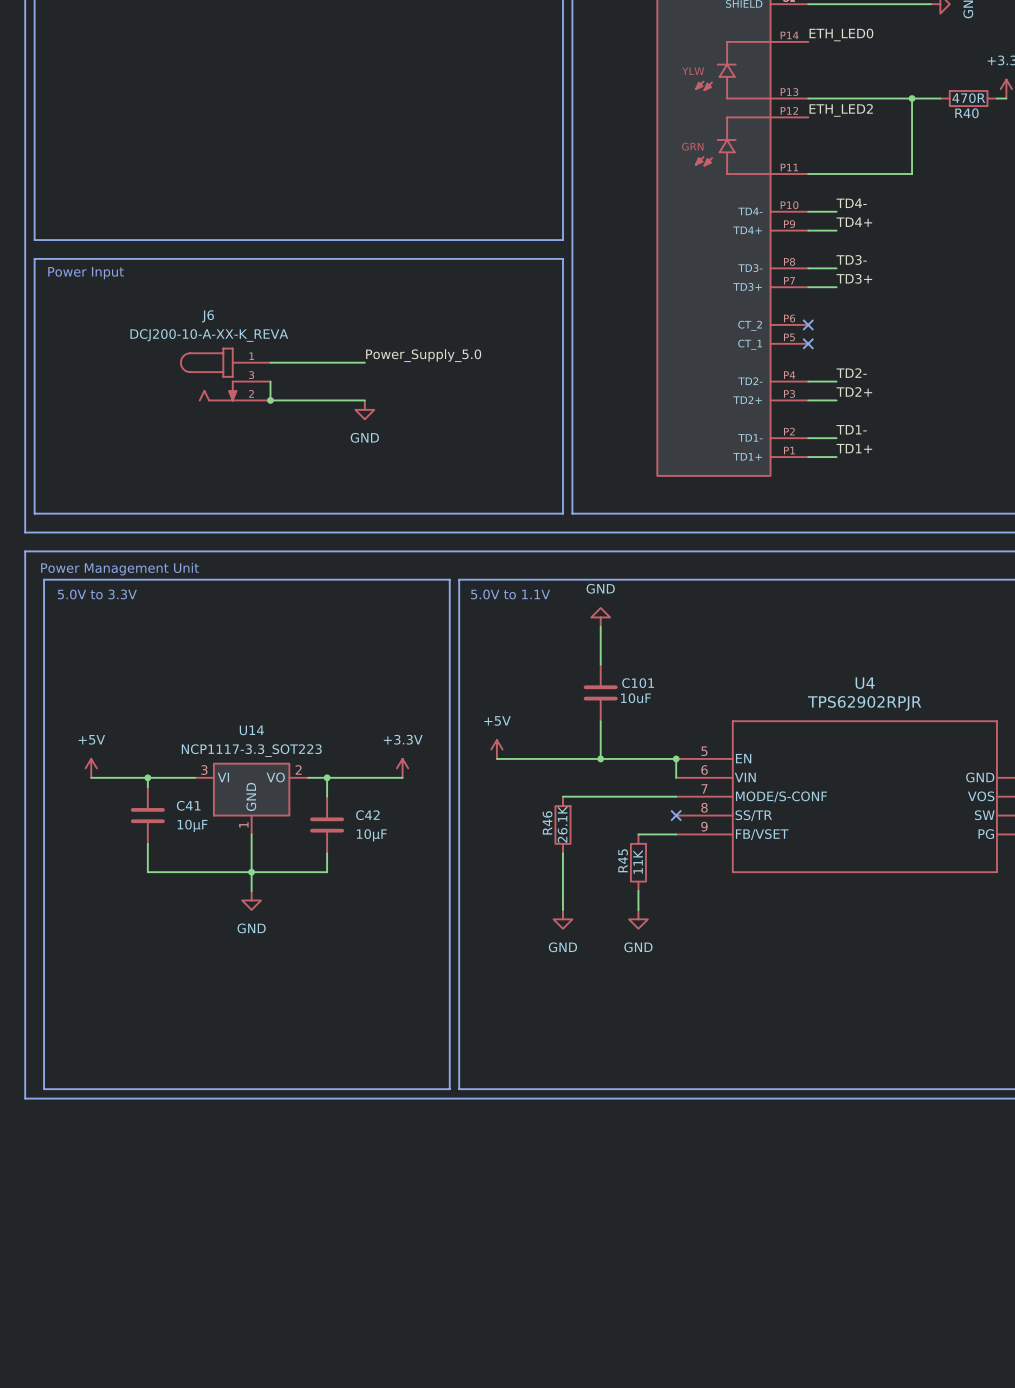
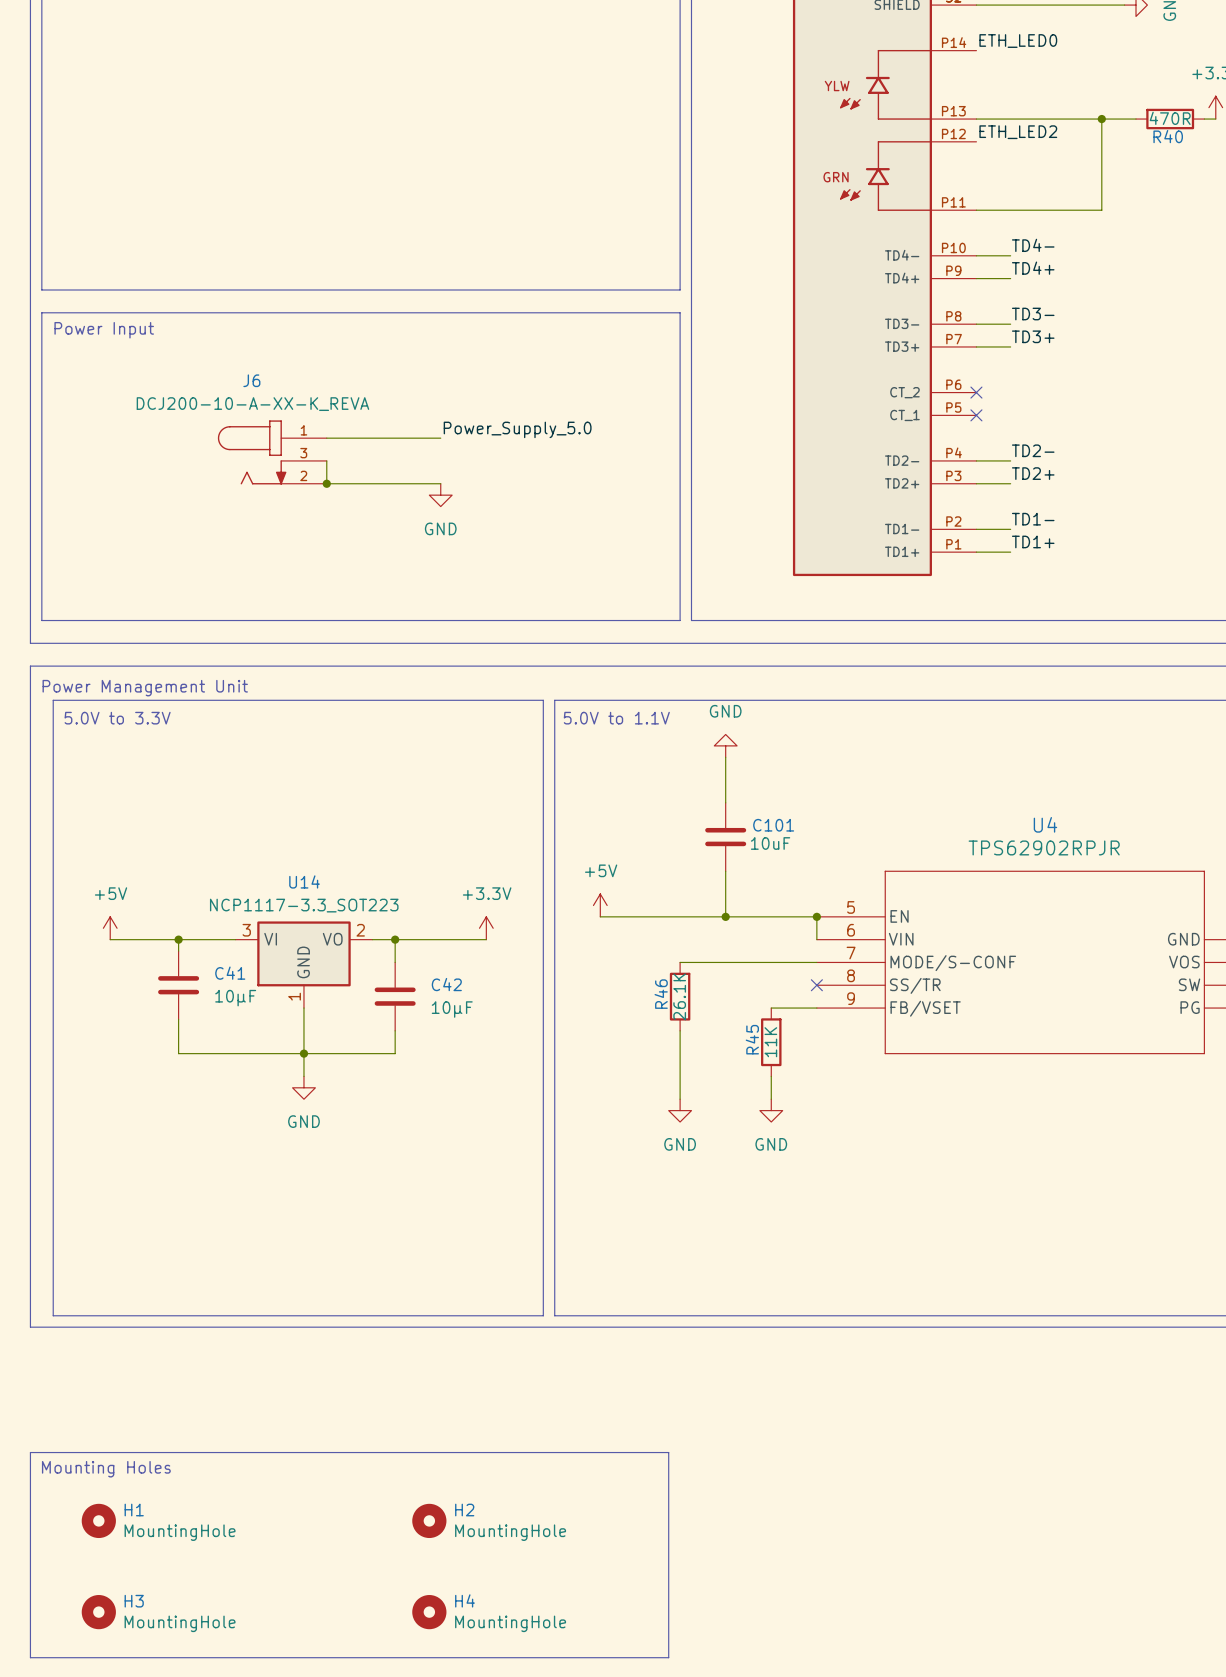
line: none -> (30, 1452) (30, 1657) (668, 1657) (668, 1452) (30, 1452)
text: none -> Mounting Holes (106, 1469)
H1: none -> MountingHole (98, 1520)
H2: none -> MountingHole (429, 1520)
H3: none -> MountingHole (98, 1612)
H4: none -> MountingHole (429, 1612)

